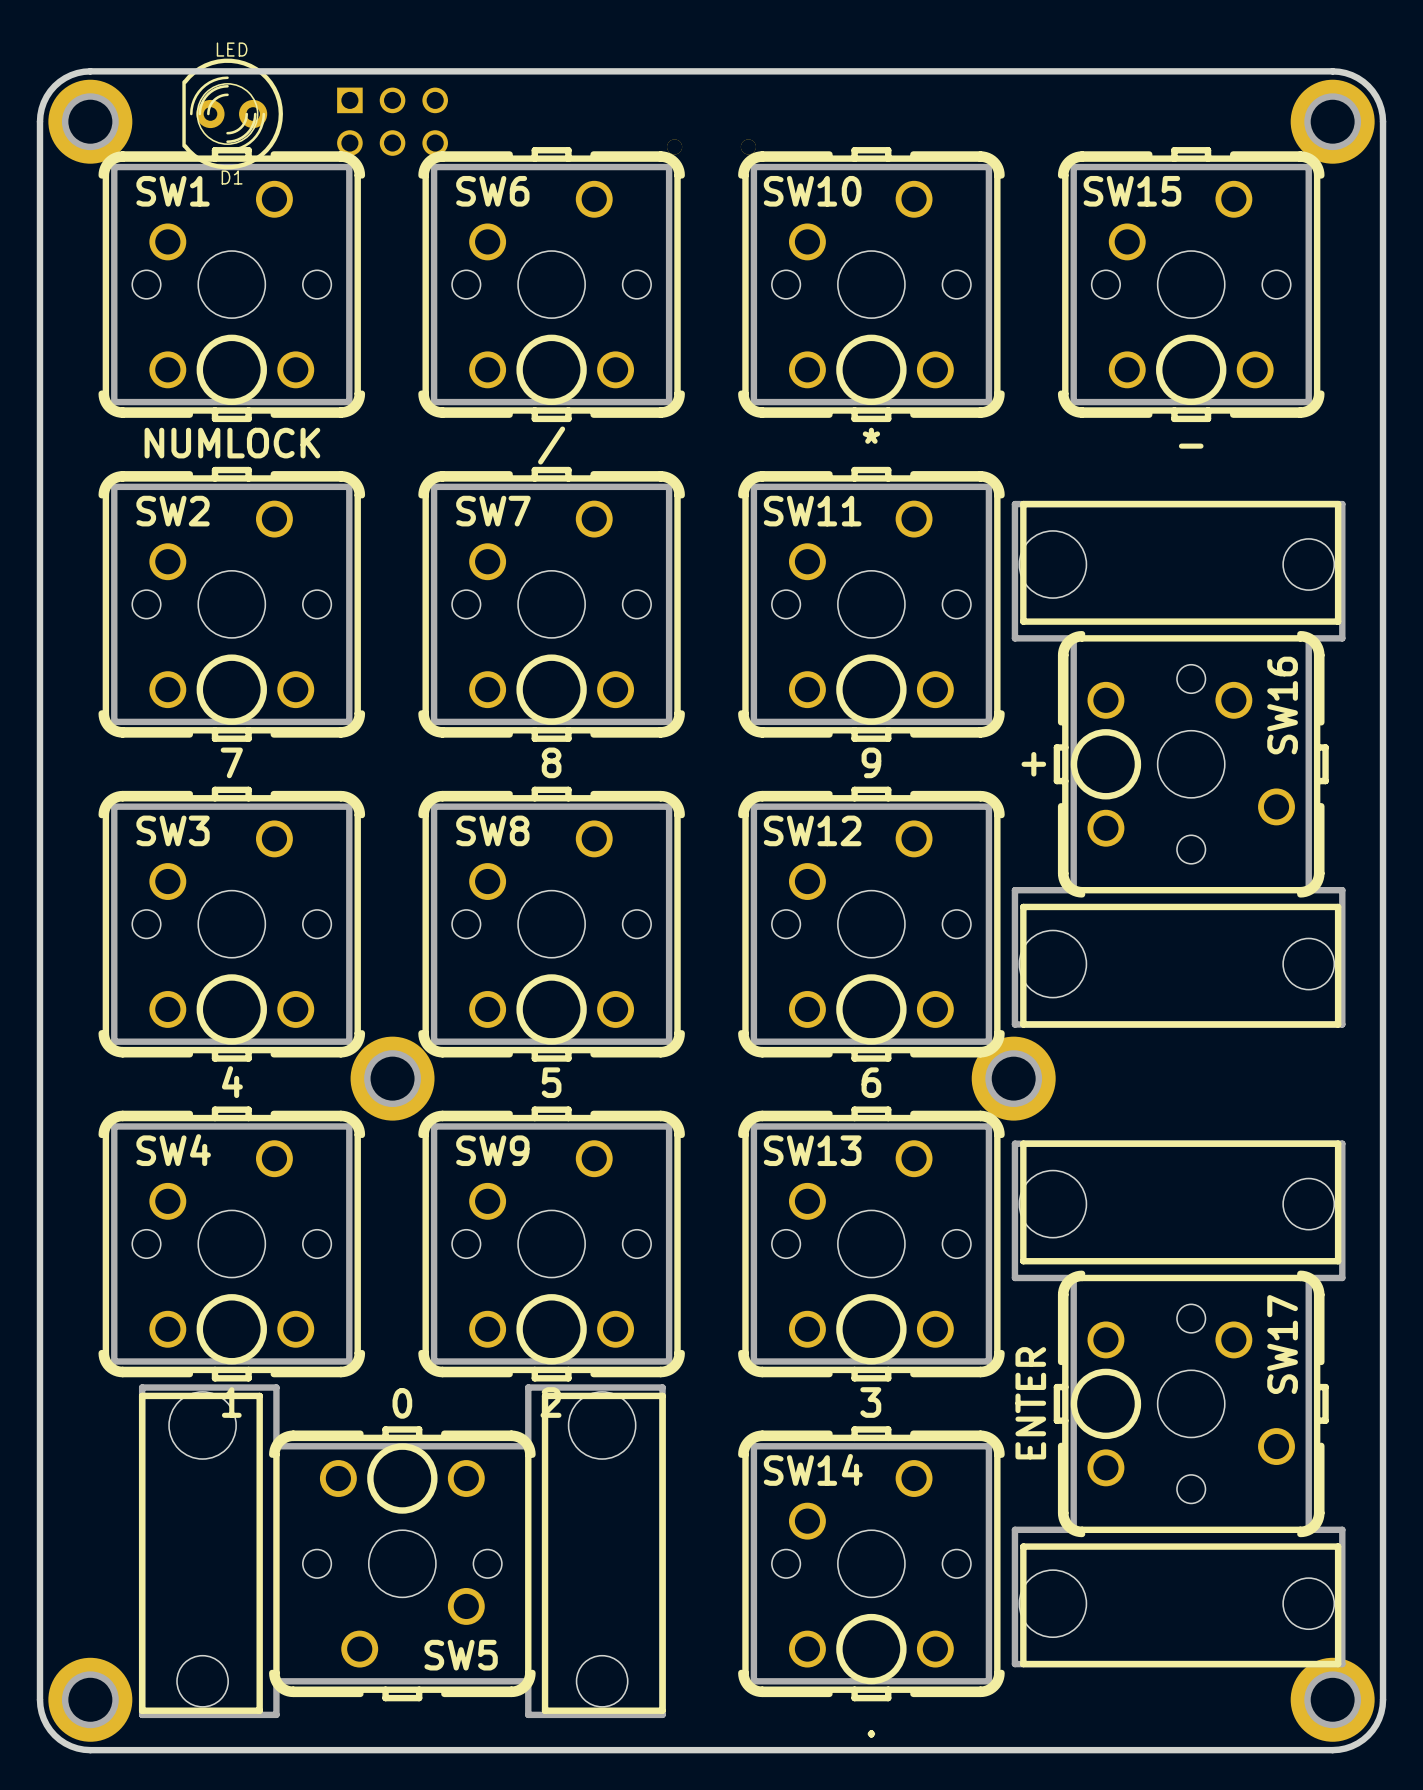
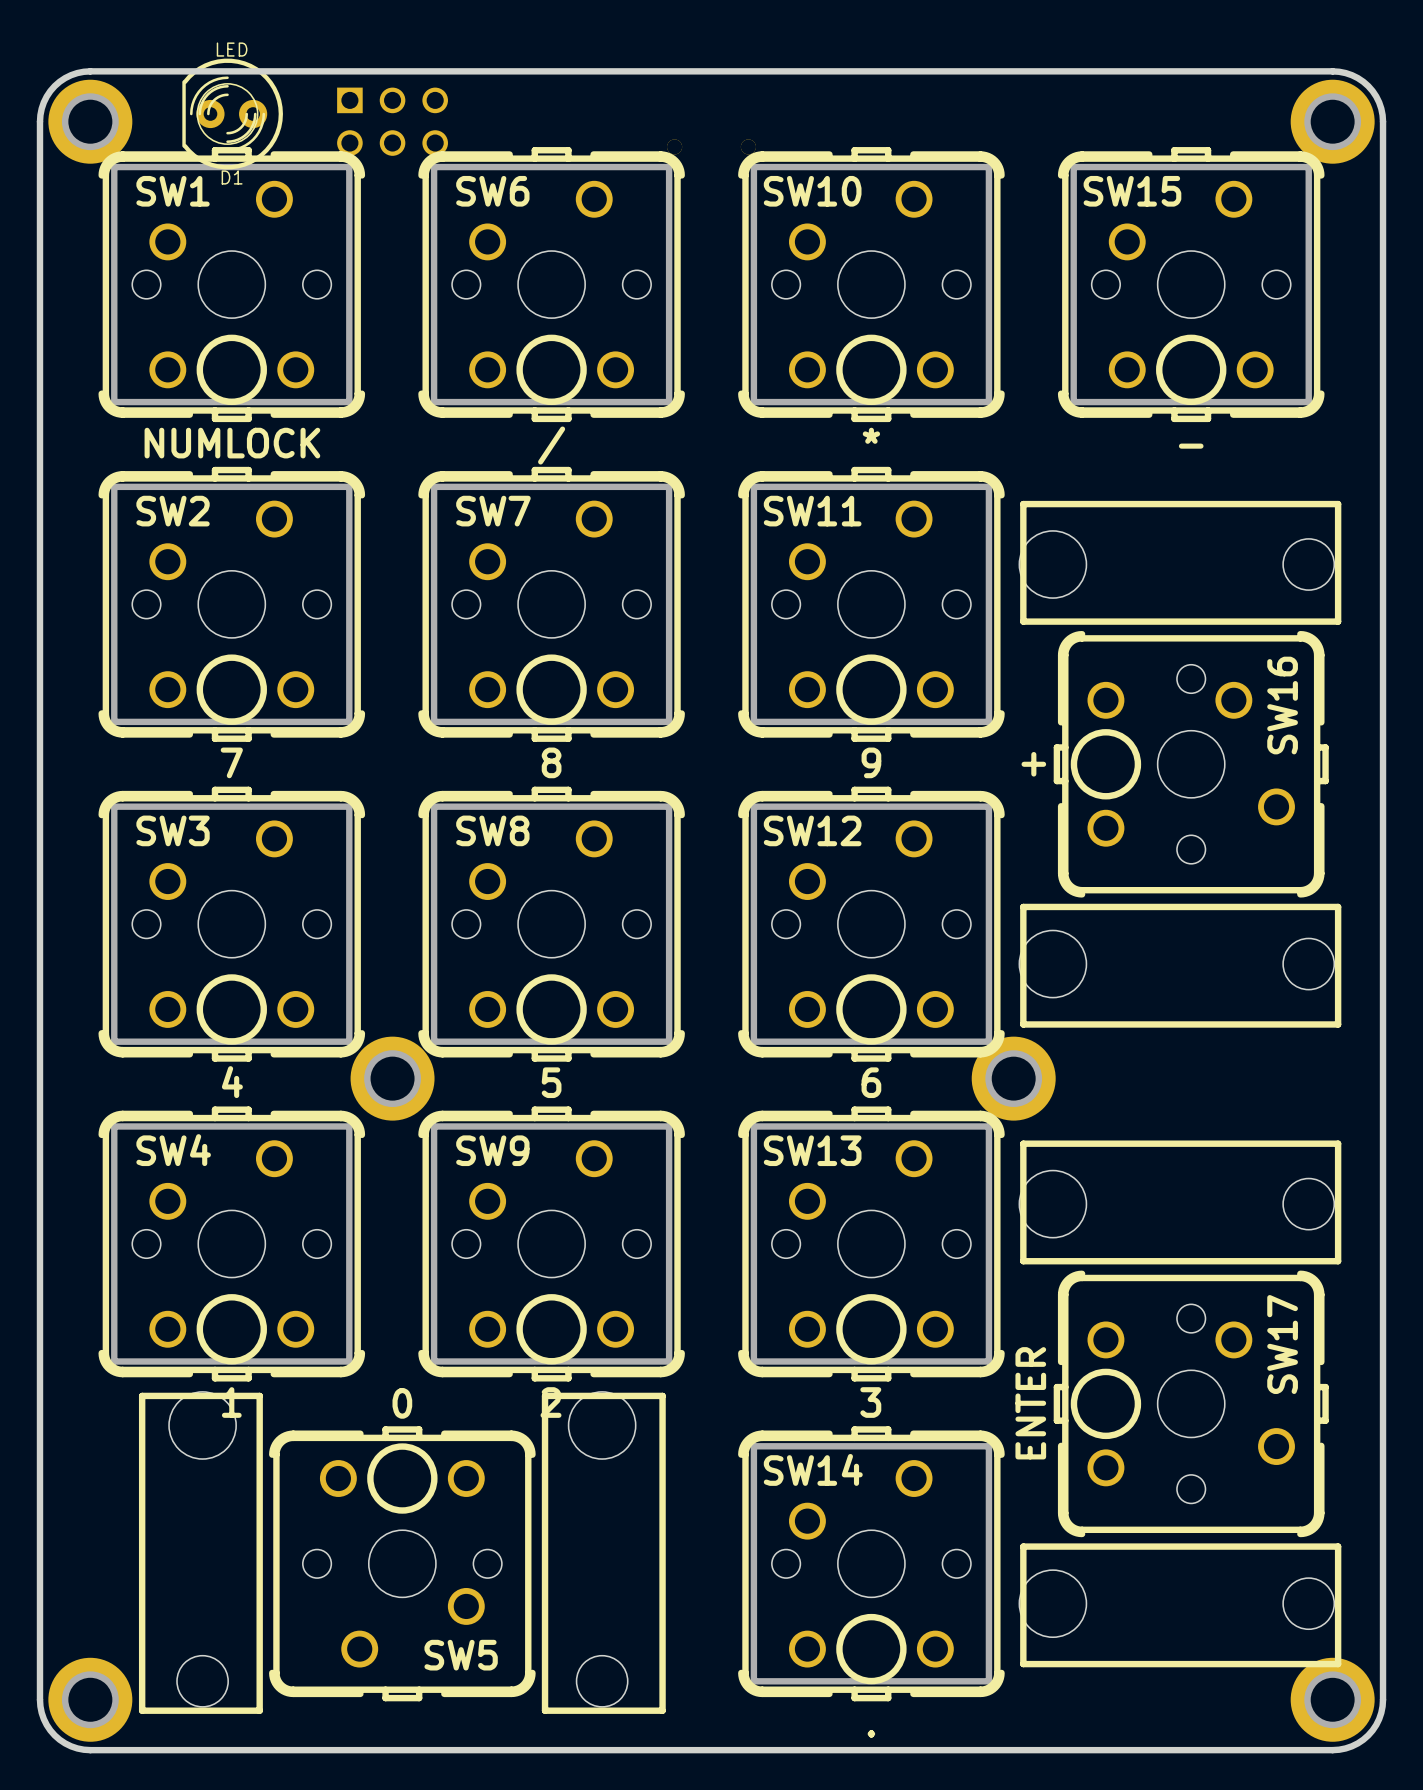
SW16 footprint: [1011, 500, 1346, 1028] -> [1019, 500, 1342, 1028]
SW17 footprint: [1011, 1140, 1346, 1668] -> [1019, 1140, 1342, 1668]
SW5 footprint: [138, 1384, 666, 1719] -> [138, 1391, 666, 1714]

